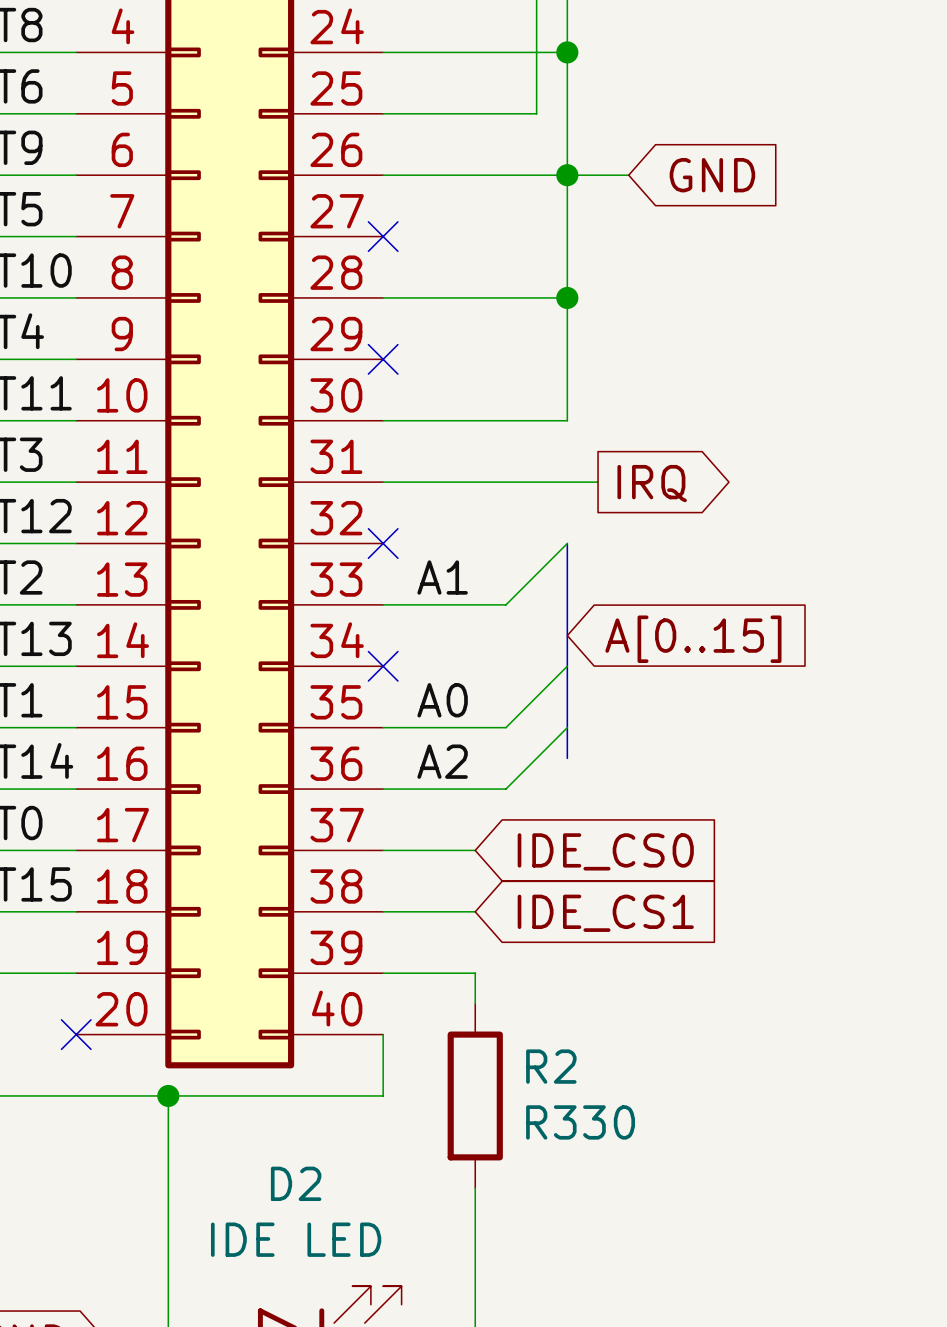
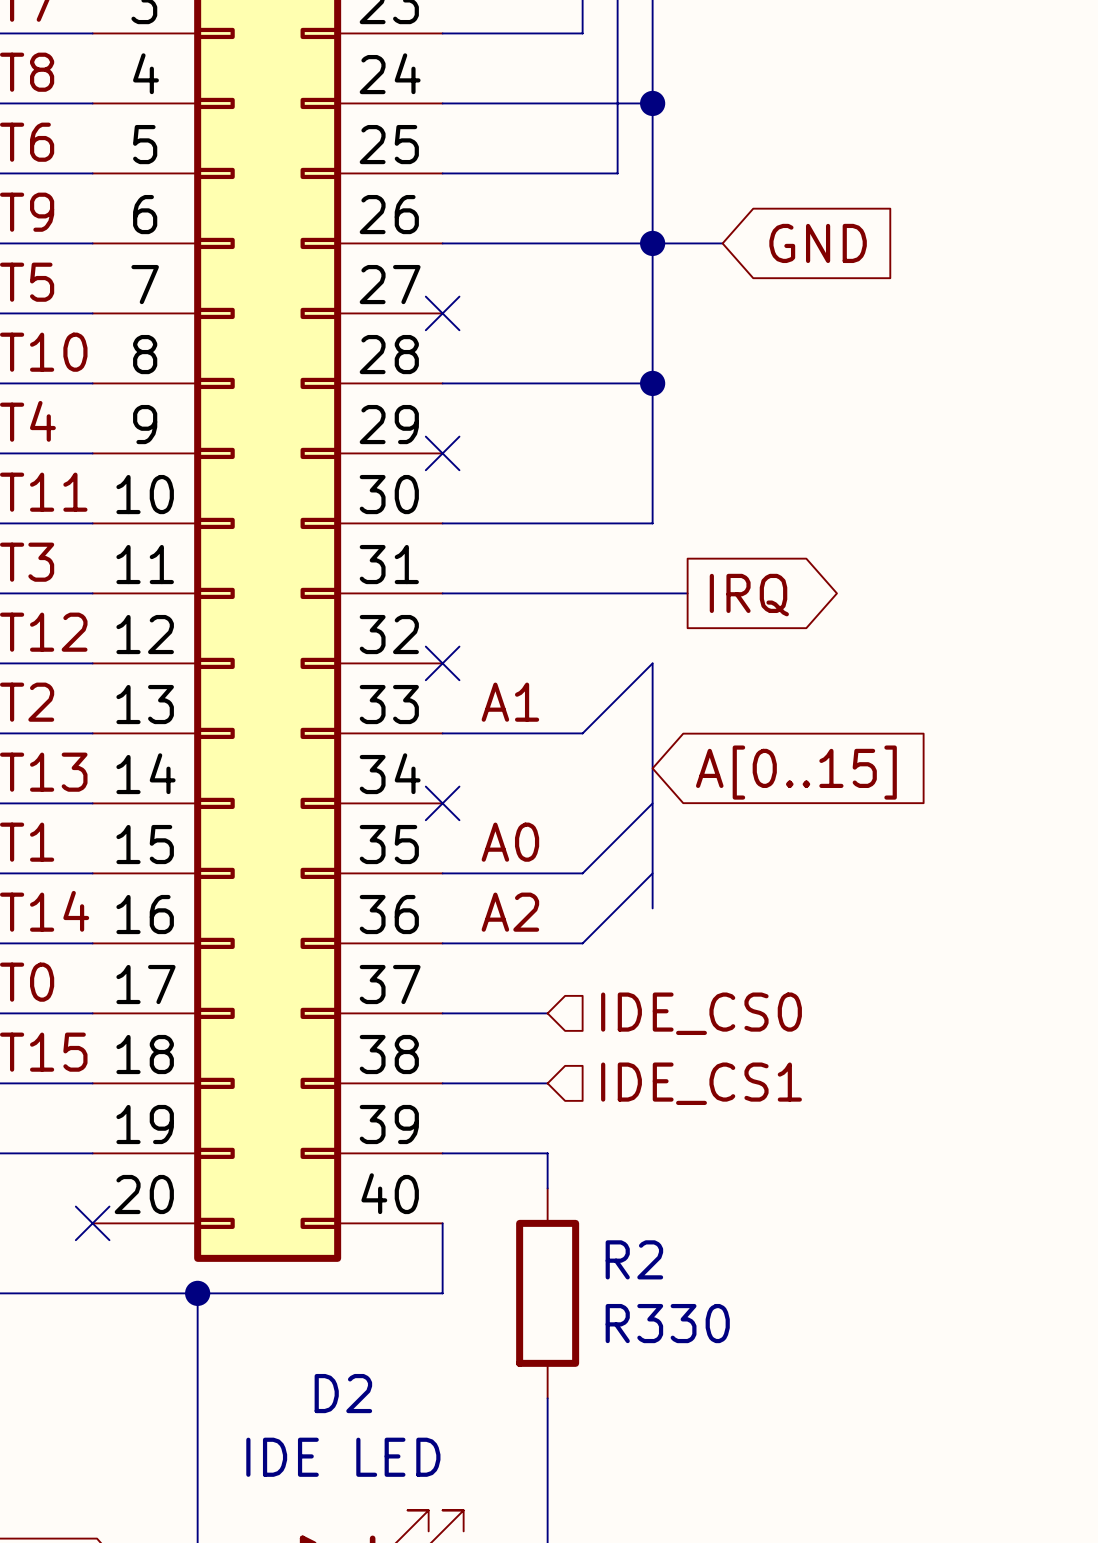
hierarchical label: none -> IDE_CS0 (701, 1013)
global label: IDE_CS0 (605, 851) -> none
hierarchical label: none -> IDE_CS1 (701, 1083)
global label: IDE_CS1 (605, 913) -> none

